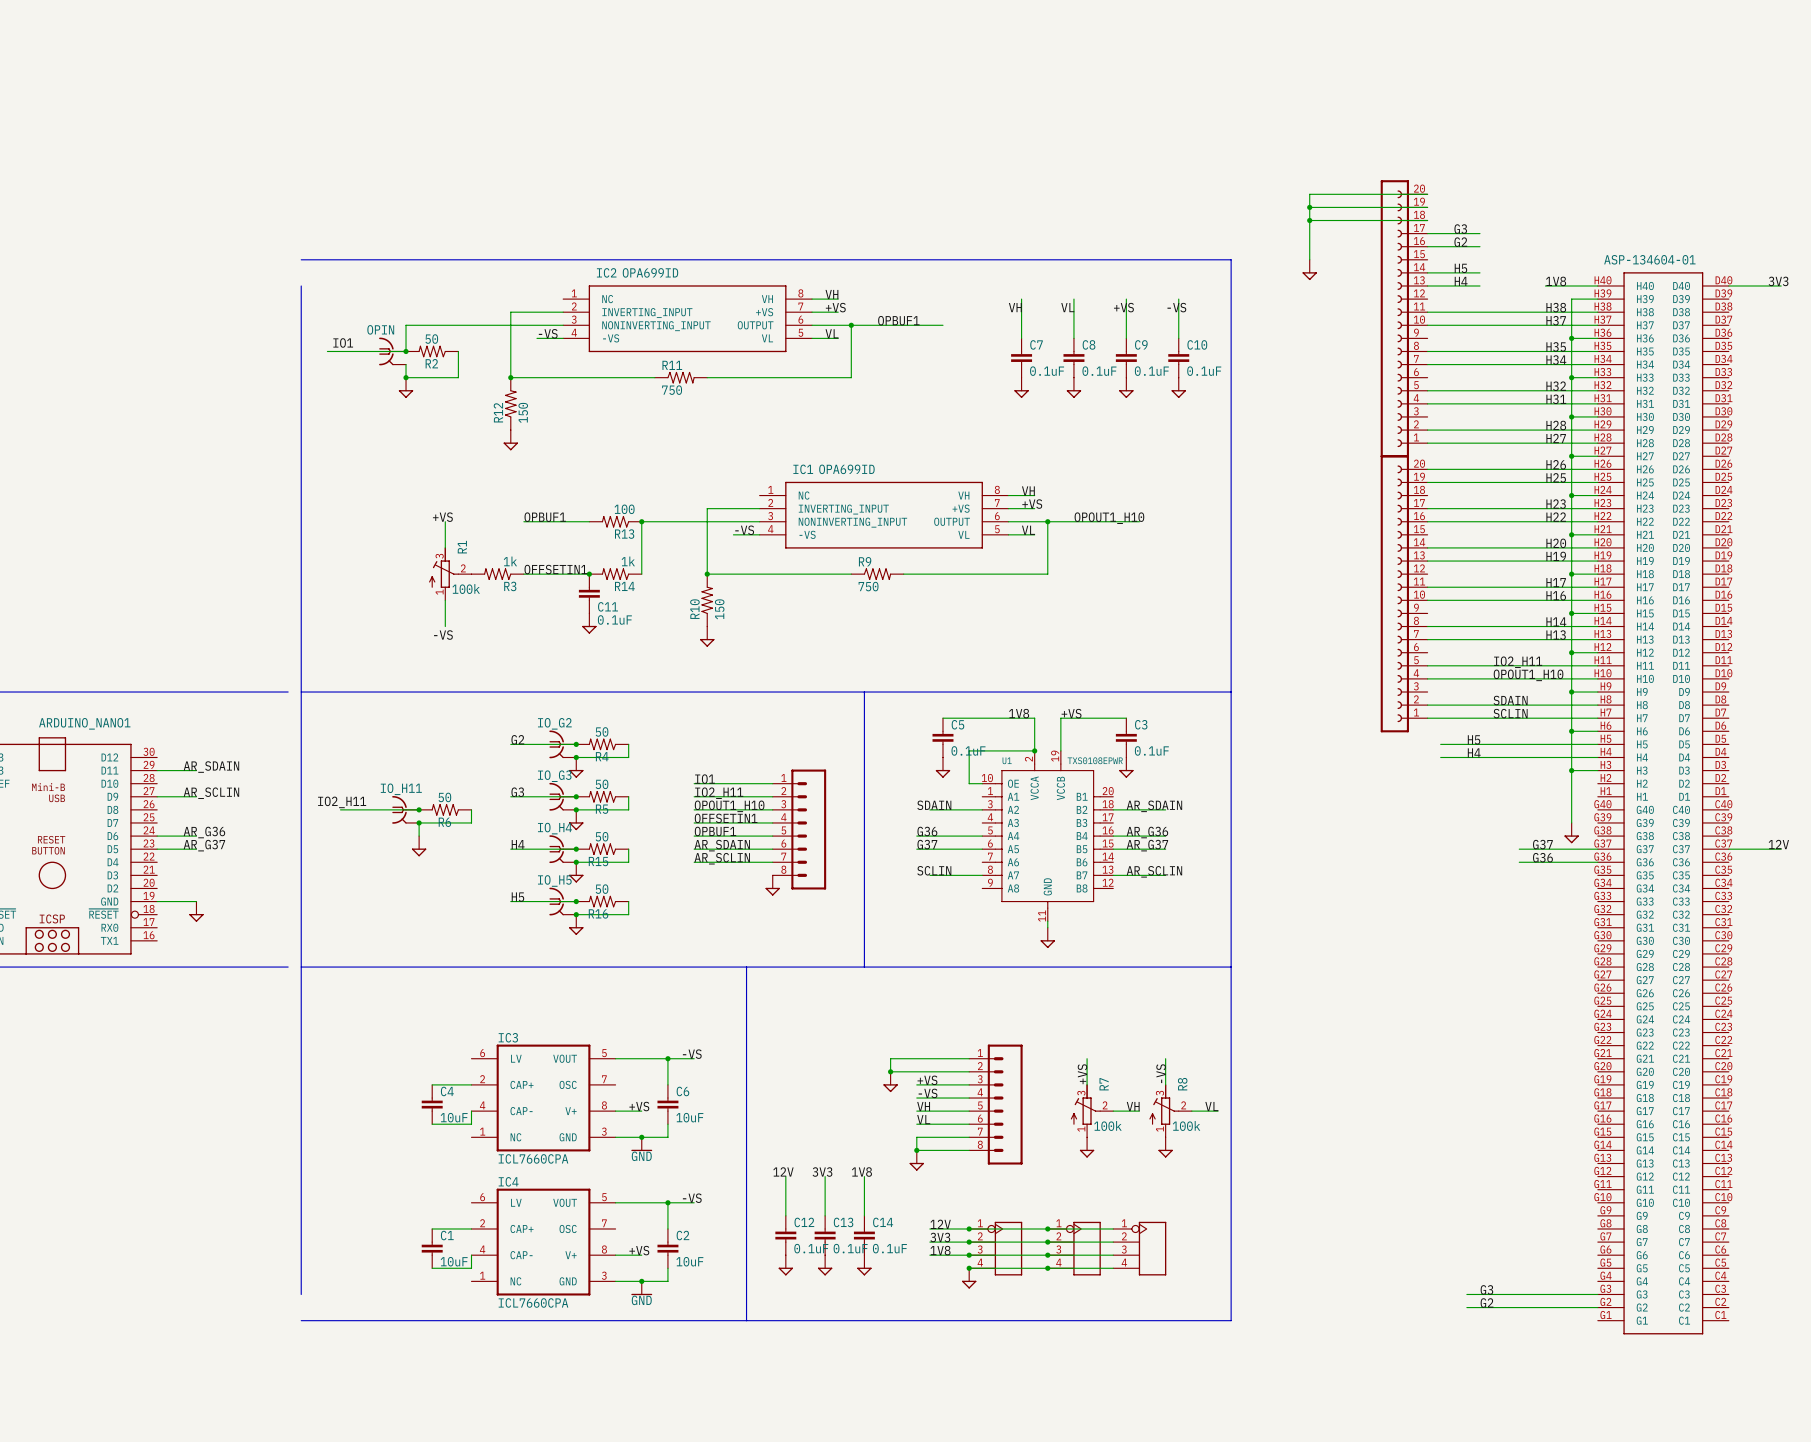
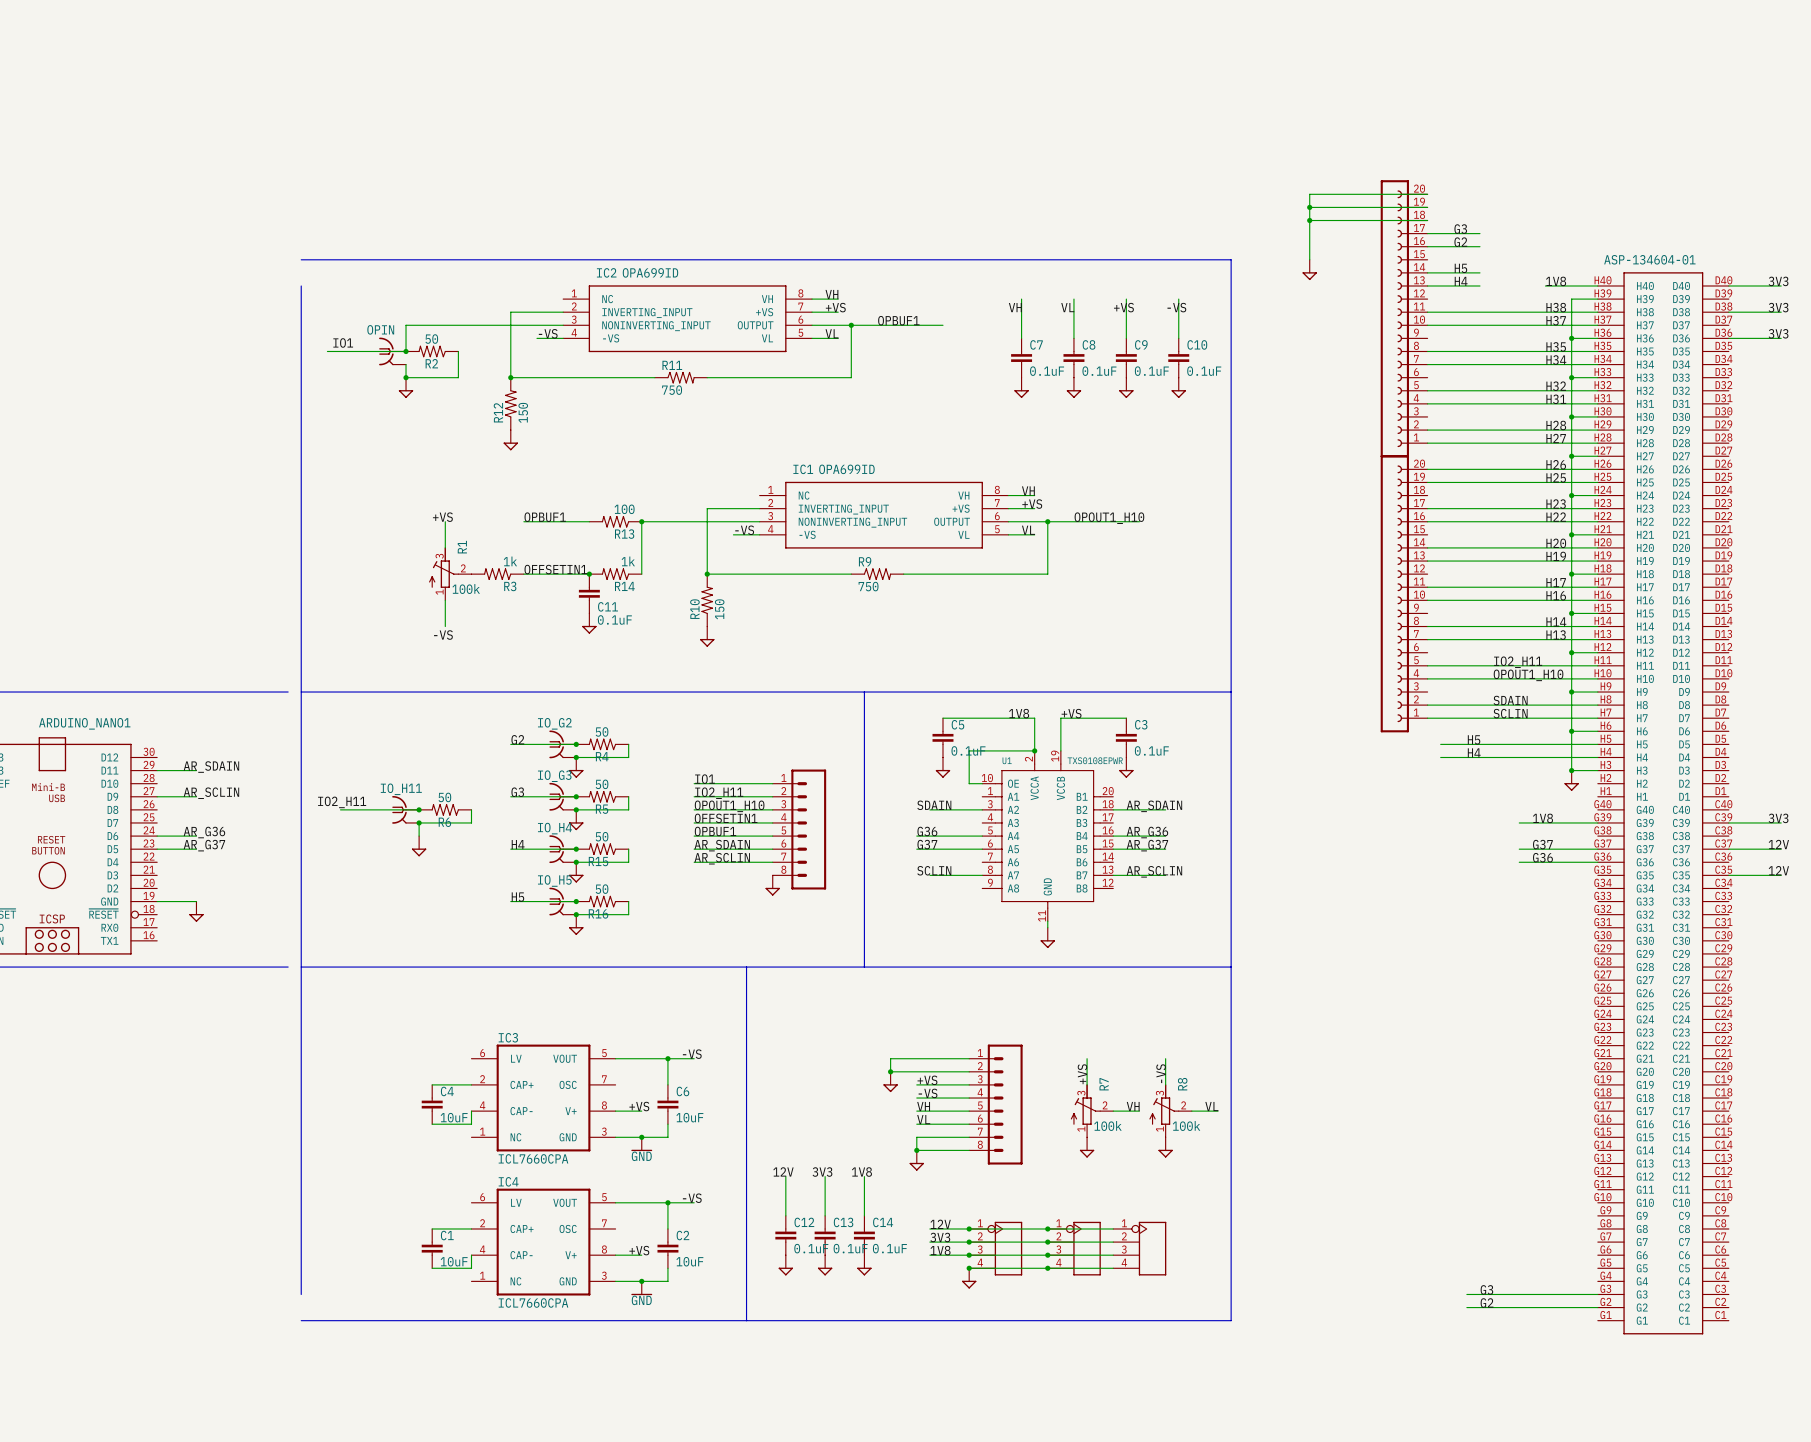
label: none -> 3V3 (1778, 307)
wire: none -> (1728, 312) (1781, 312)
label: none -> 3V3 (1778, 333)
wire: none -> (1728, 338) (1781, 338)
wire: (1571, 770) (1571, 822) -> none
label: none -> 1V8 (1542, 818)
label: none -> 3V3 (1778, 818)
wire: none -> (1519, 822) (1597, 822)
wire: none -> (1728, 822) (1781, 822)
power symbol position: (1571, 833) -> (1571, 780)
label: none -> 12V (1778, 870)
wire: none -> (1728, 875) (1781, 875)

